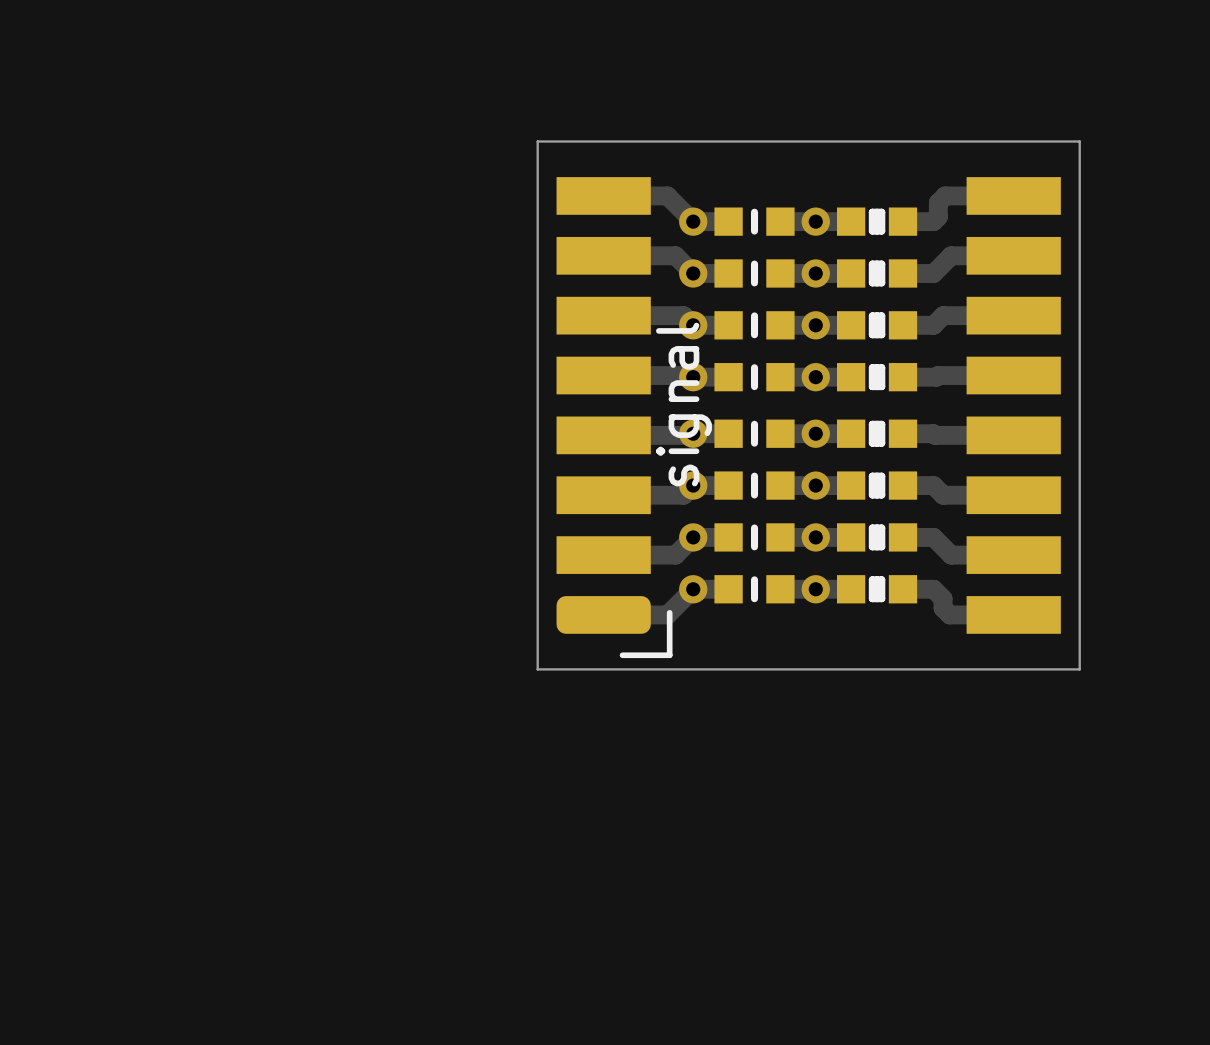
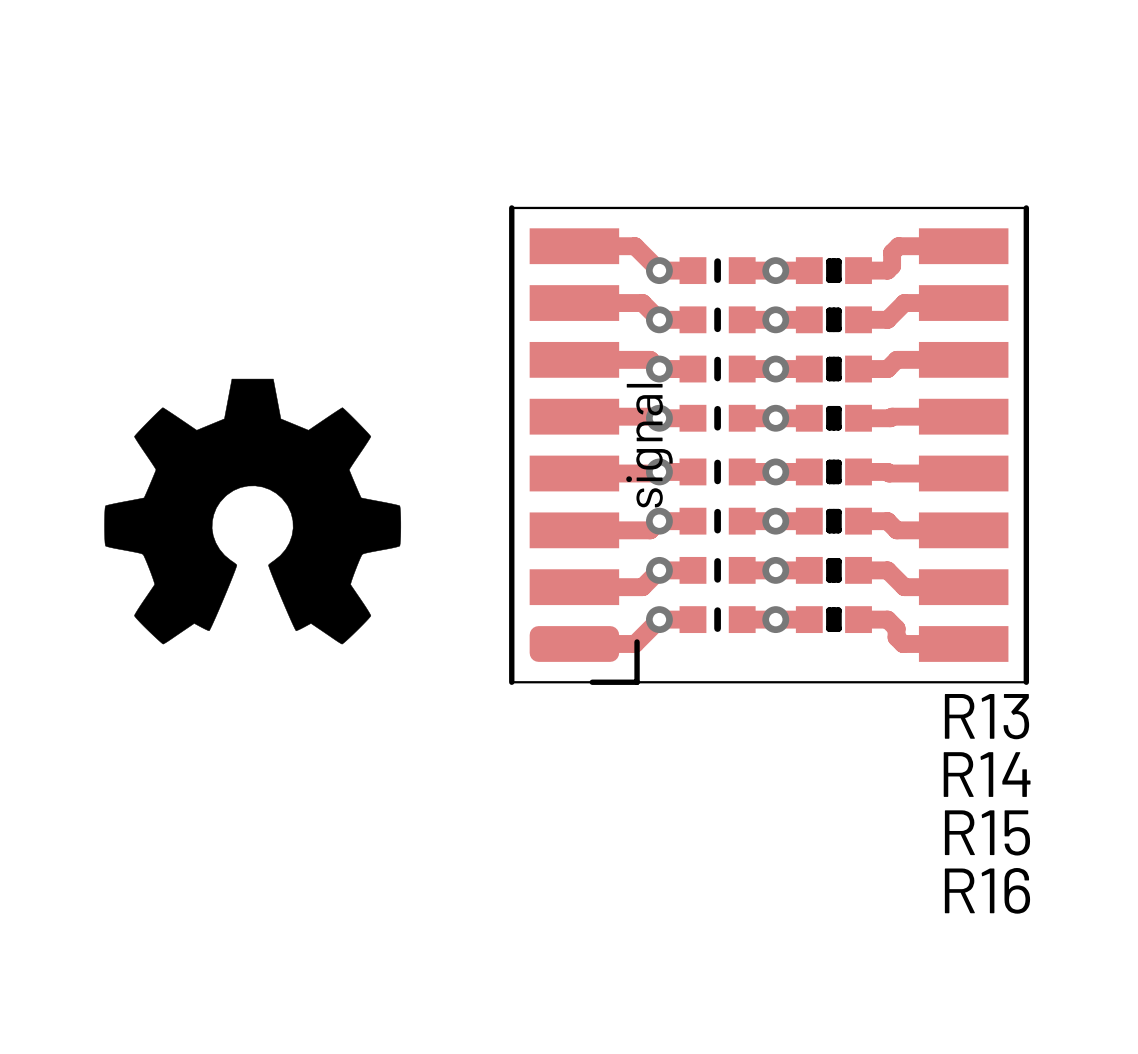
board edge: none -> (511, 207) (1026, 207)
board edge: (537, 165) (537, 141) (1079, 141) (1079, 669) (537, 669) (537, 655) -> (1026, 682) (511, 682)
part footprint: [556, 177, 673, 659] -> [509, 205, 640, 685]
part footprint: [966, 177, 1061, 634] -> [918, 205, 1030, 685]
drawing: none -> [104, 378, 402, 645]
board edge: (537, 386) (537, 641) -> none
R13 name: none -> R13 (986, 716)
R14 name: none -> R14 (987, 774)
R15 name: none -> R15 (987, 832)
R16 name: none -> R16 (987, 890)

